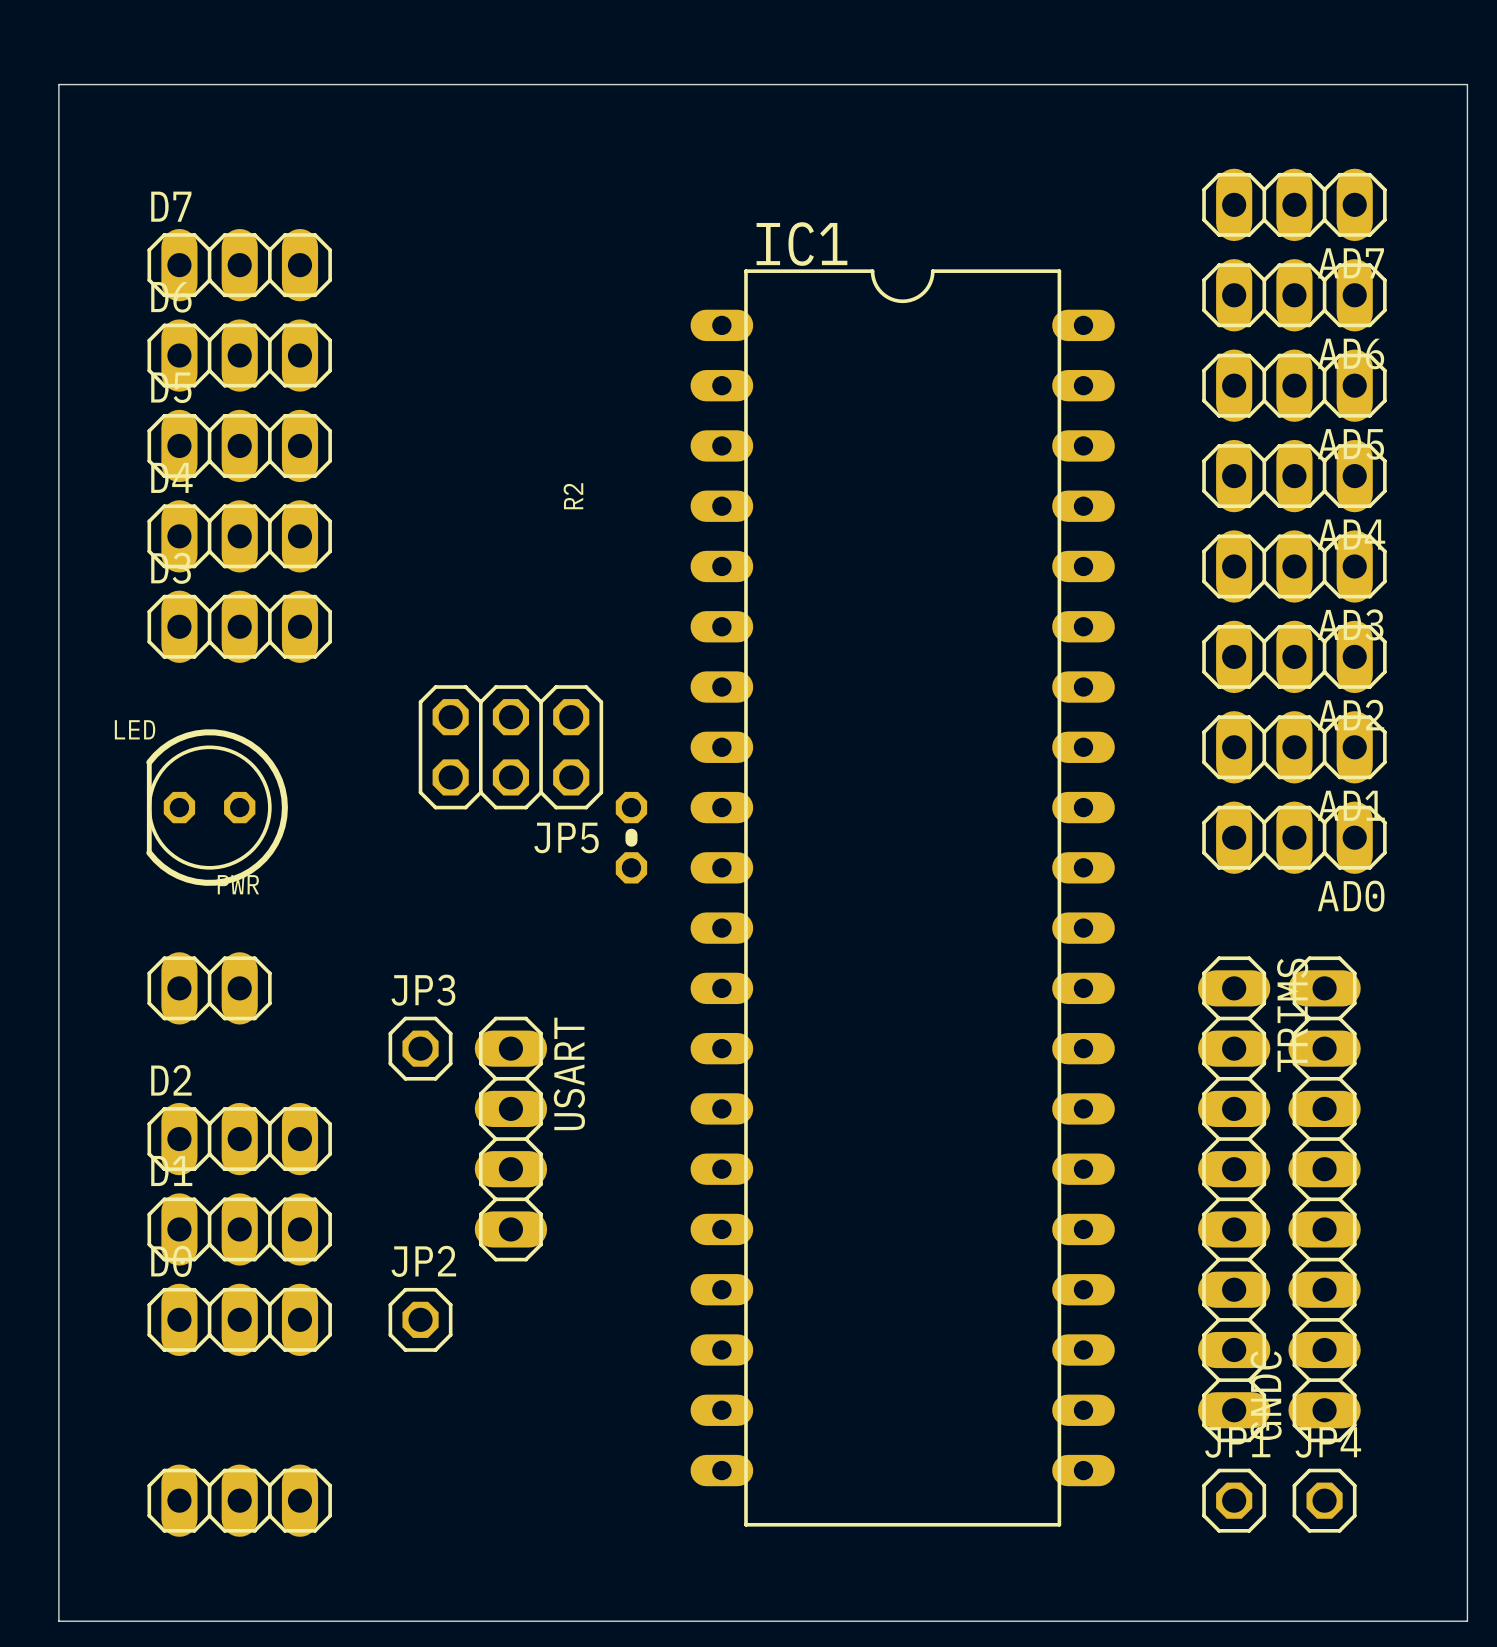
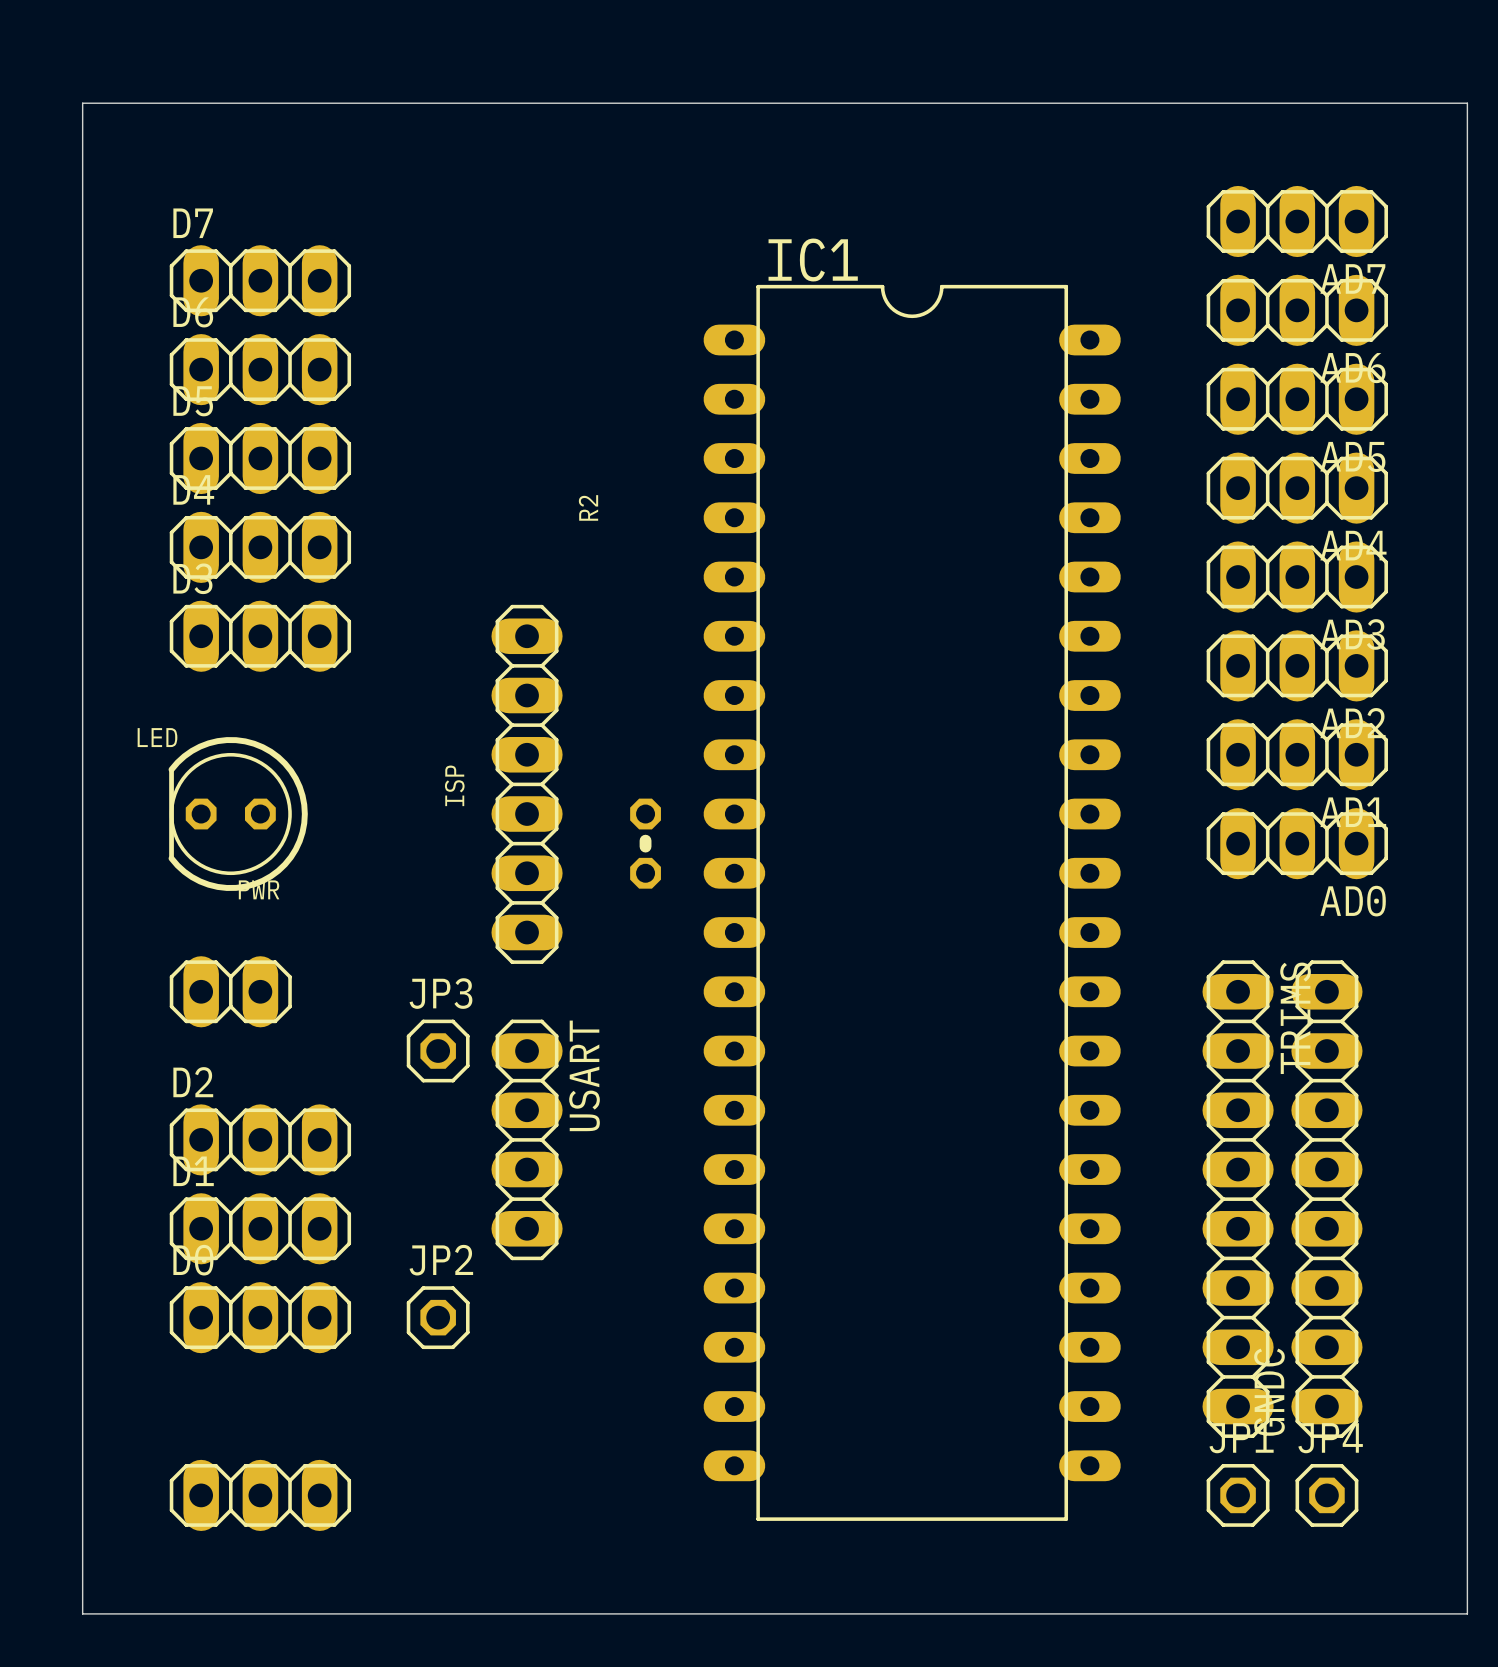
JP5: (510, 747) -> none
ISP: none -> (527, 784)

